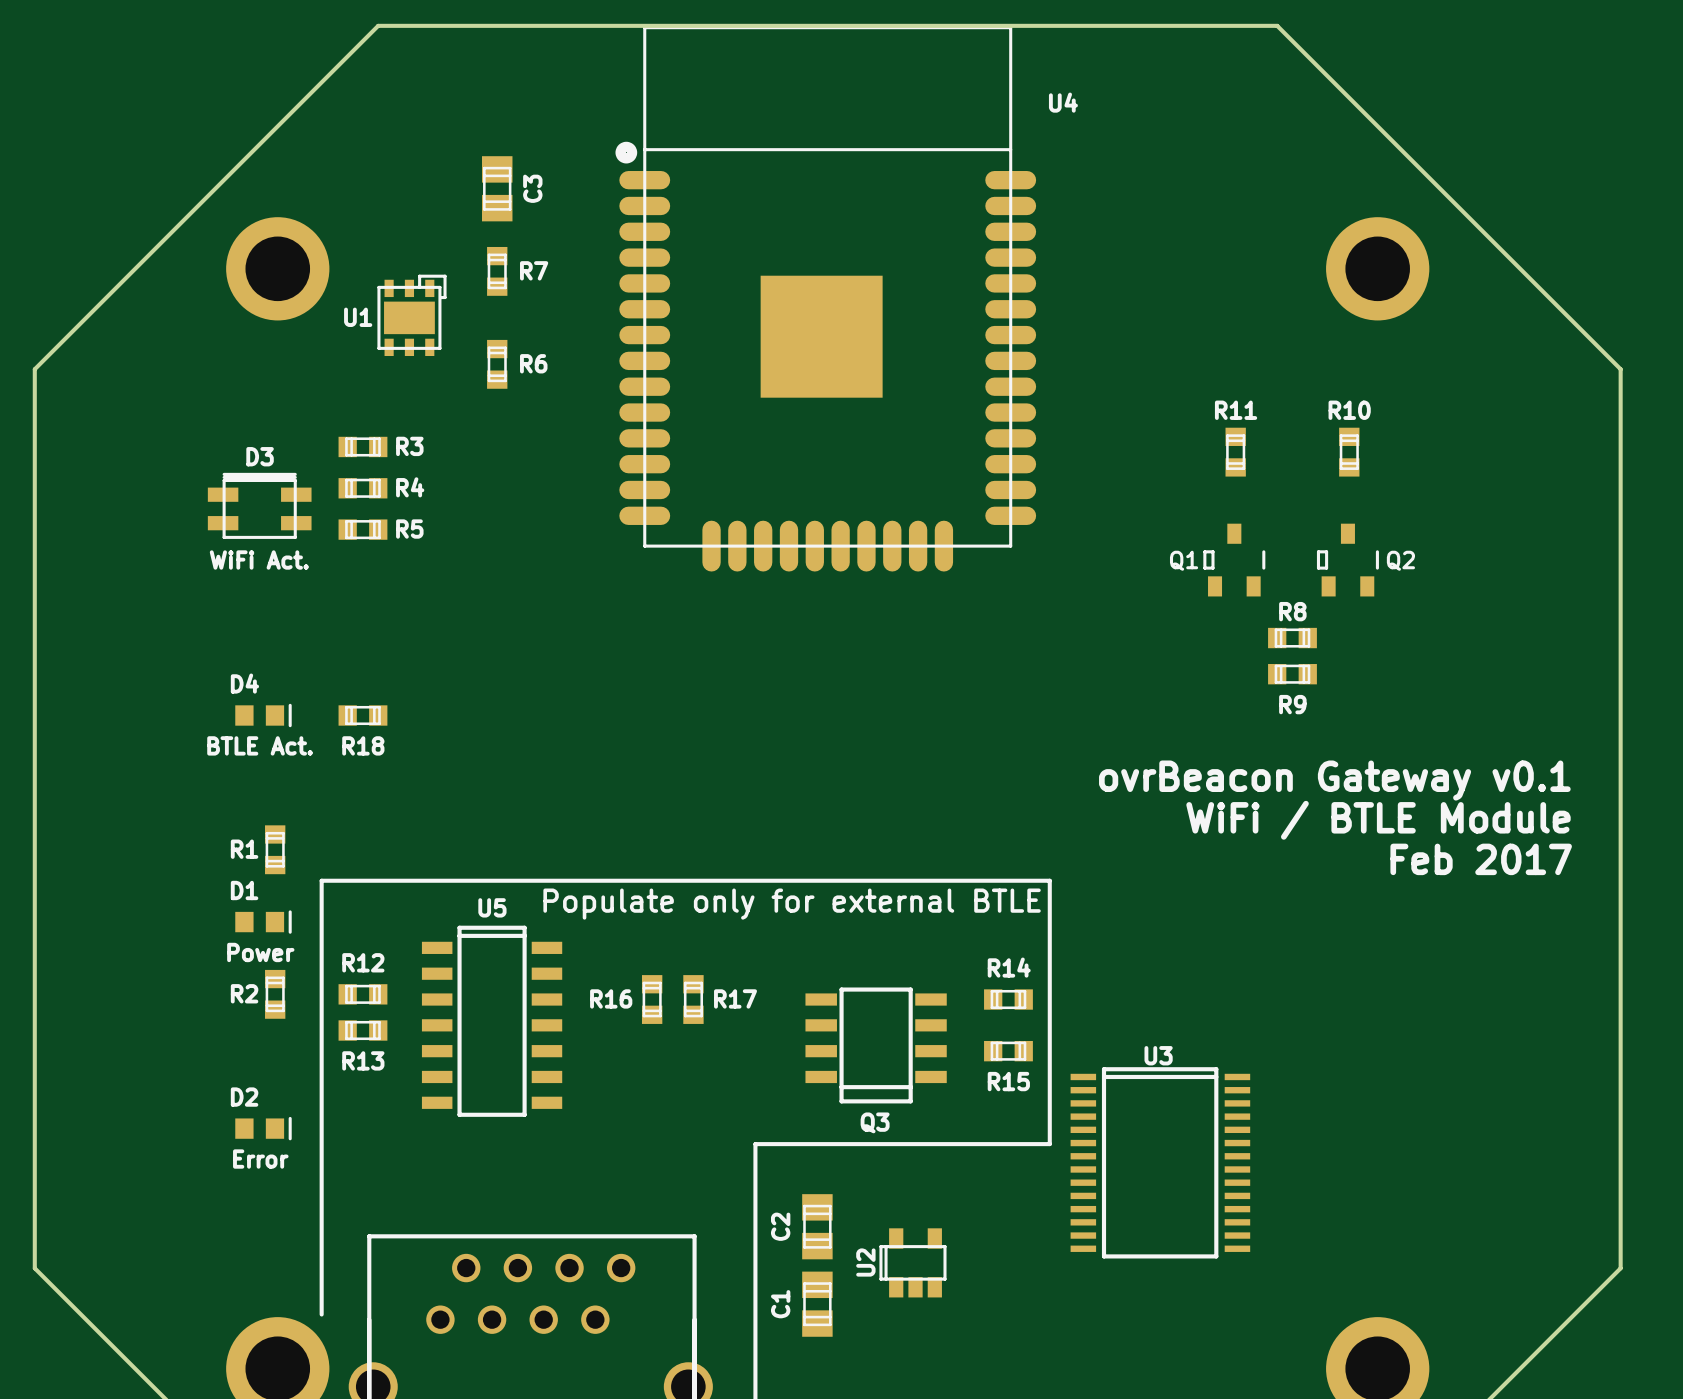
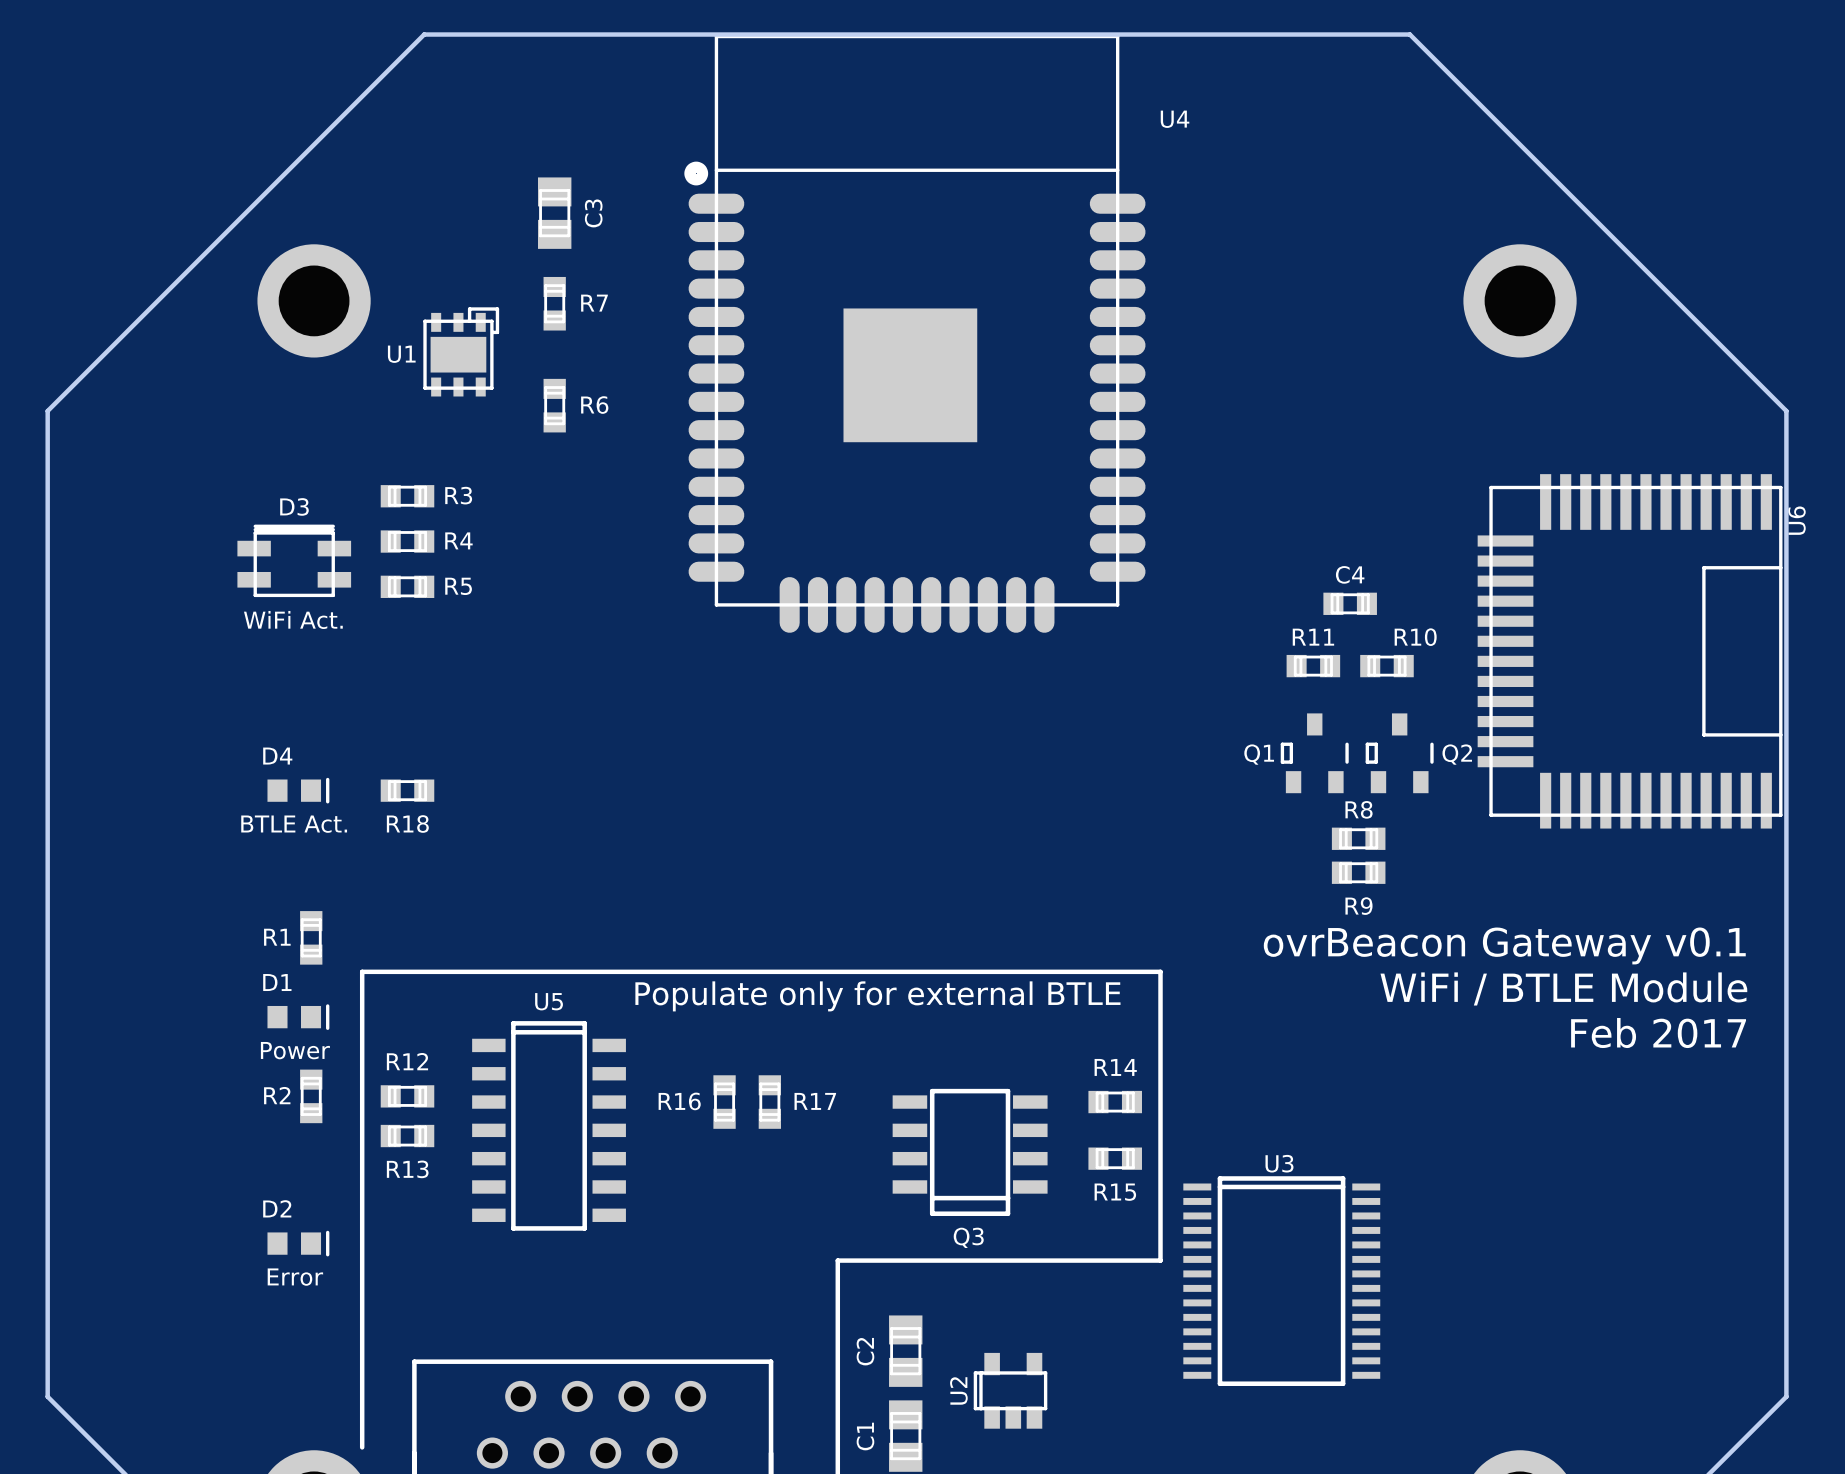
R11 rotation: 0° (1235, 452) -> 90° clockwise (1313, 666)
R11 position: (1235, 452) -> (1313, 666)
R10 rotation: 0° (1349, 452) -> 90° counterclockwise (1386, 666)
R10 position: (1349, 452) -> (1386, 666)
C4: none -> (1350, 603)
Q1 position: (1234, 560) -> (1314, 753)
Q2 position: (1347, 560) -> (1399, 753)
U6: none -> (1630, 651)
R8 position: (1292, 638) -> (1358, 838)
R9 position: (1292, 674) -> (1358, 872)
text position: ovrBeacon Gateway v0.1 (1334, 780) -> ovrBeacon Gateway v0.1 (1504, 945)
text position: WiFi / BTLE Module (1378, 820) -> WiFi / BTLE Module (1563, 988)
text position: Feb 2017 (1481, 859) -> Feb 2017 (1658, 1033)

